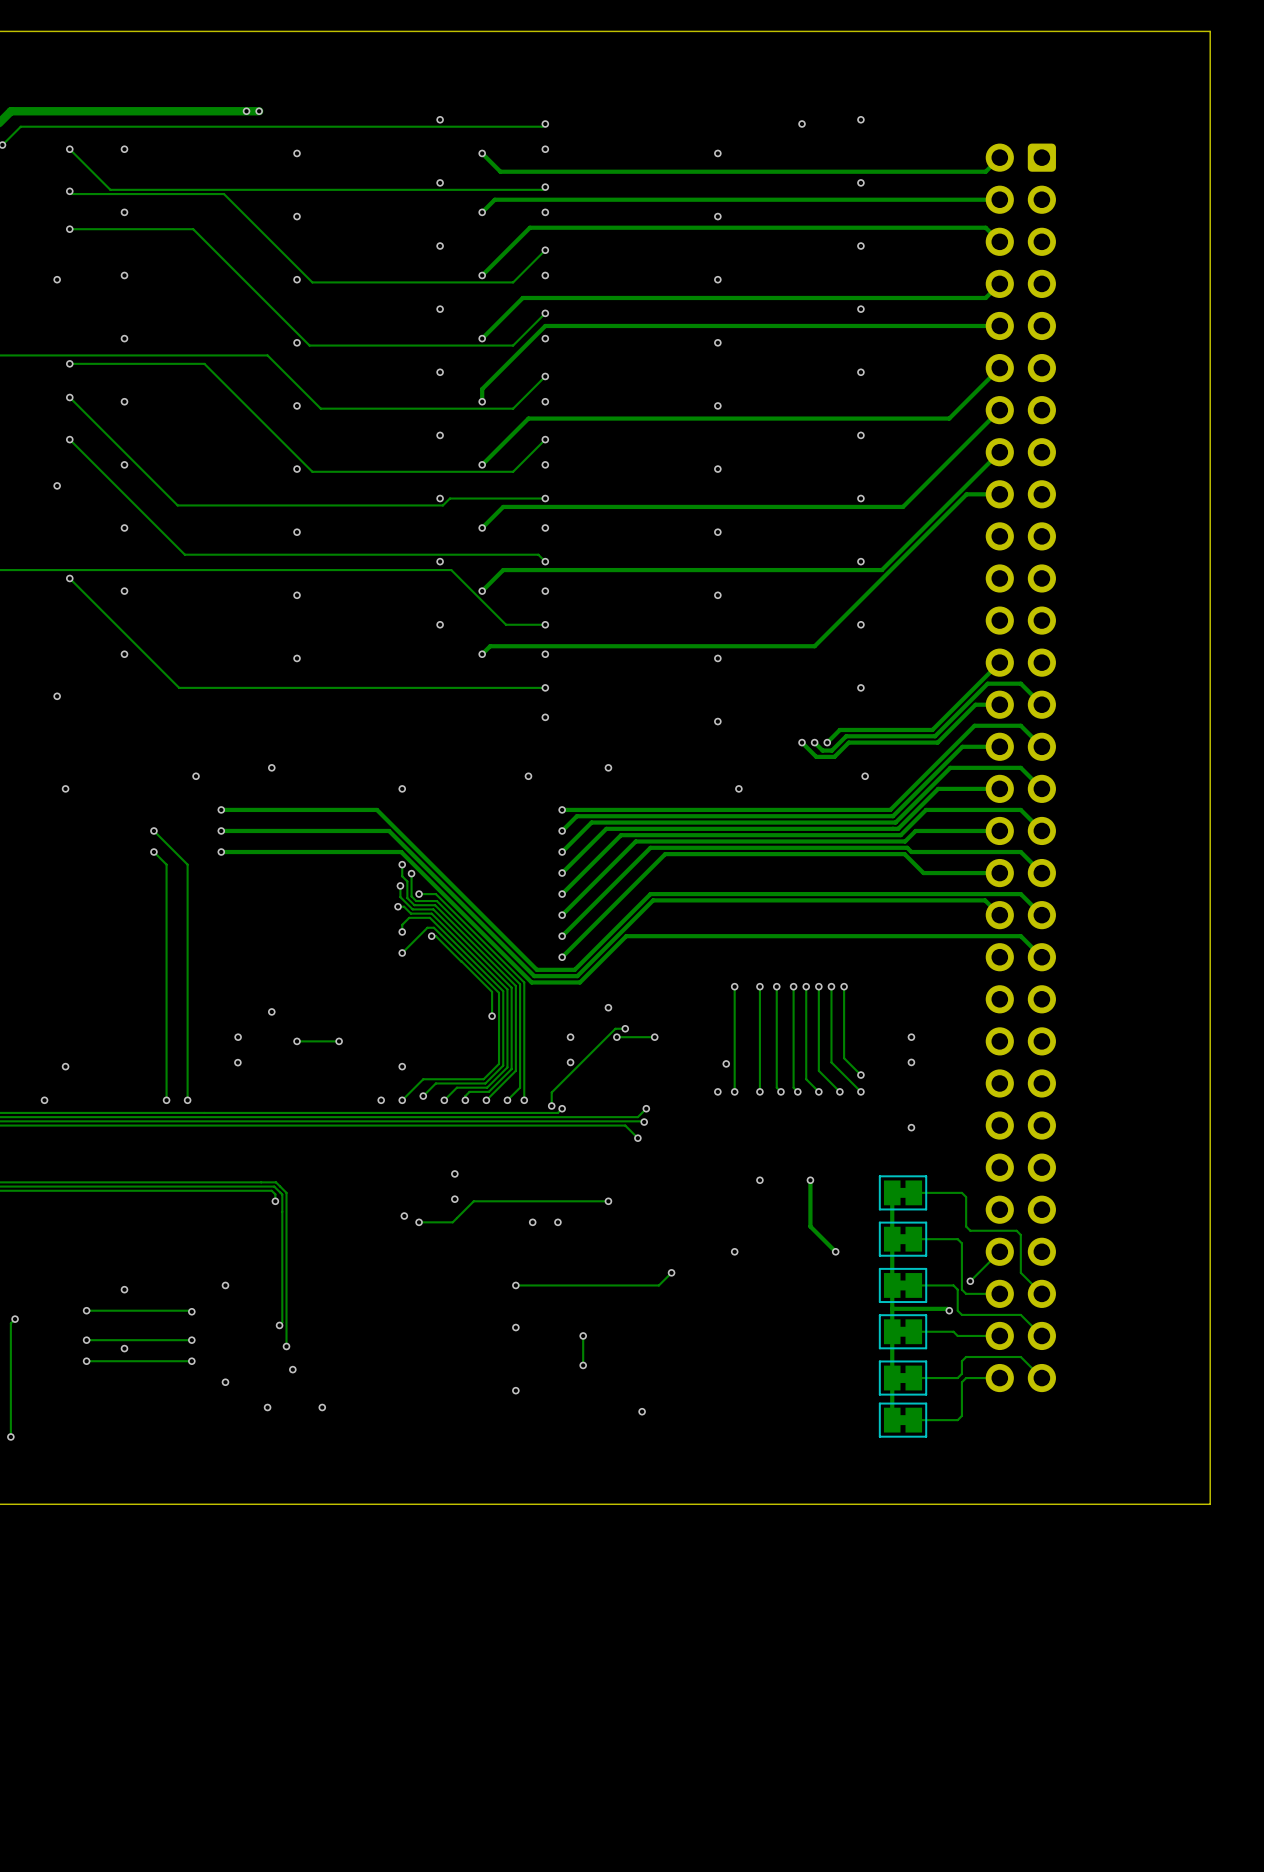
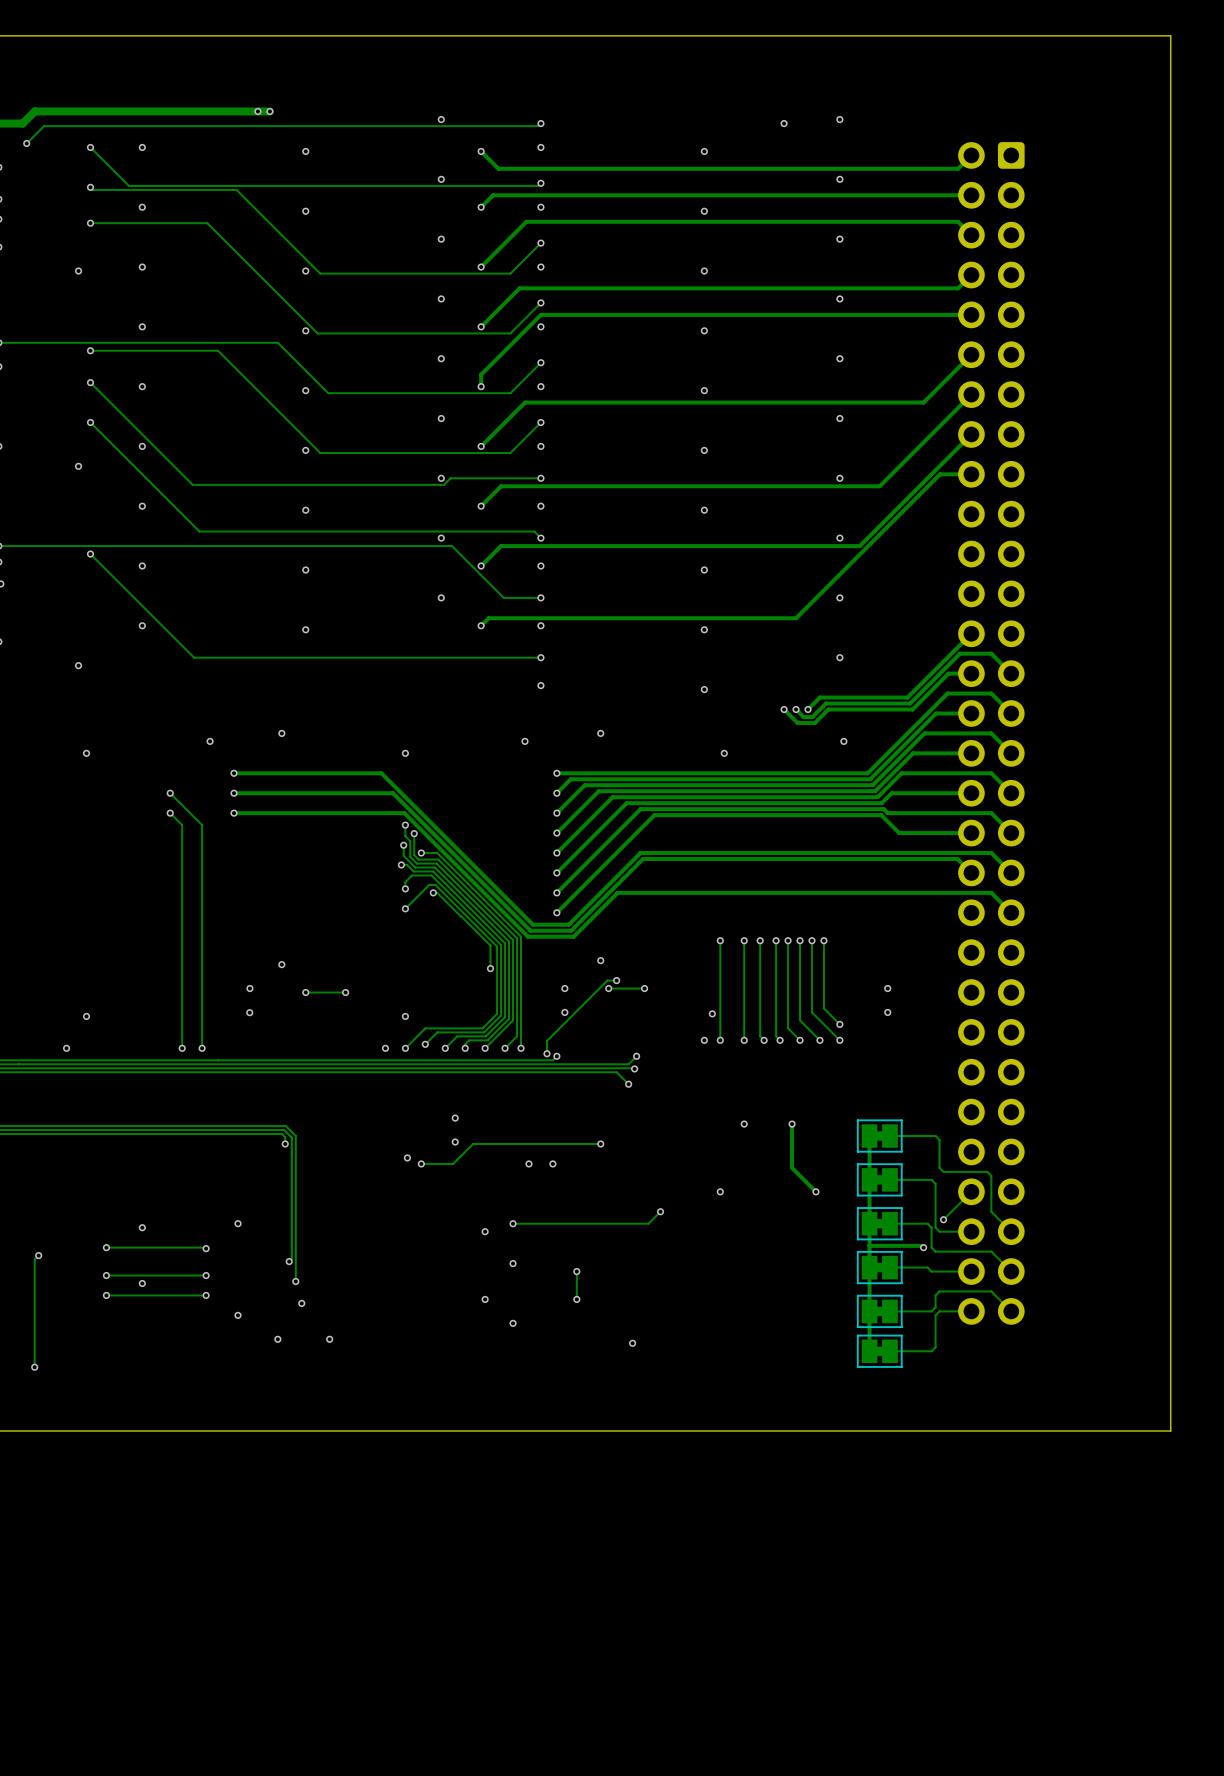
via: (911, 1127) -> none
via: none -> (485, 1231)
via: none -> (485, 1299)

